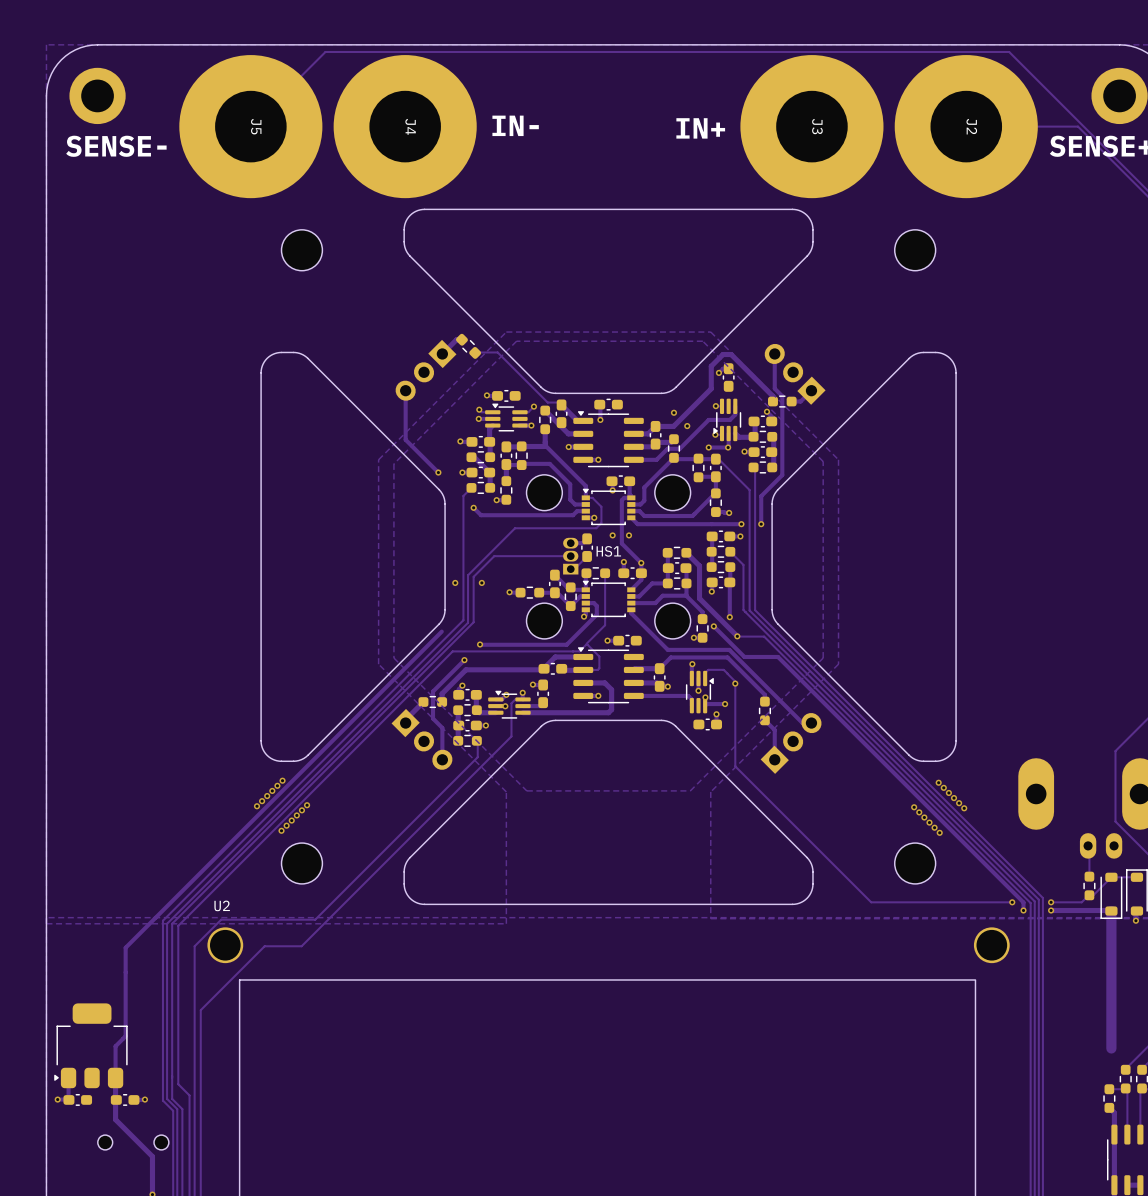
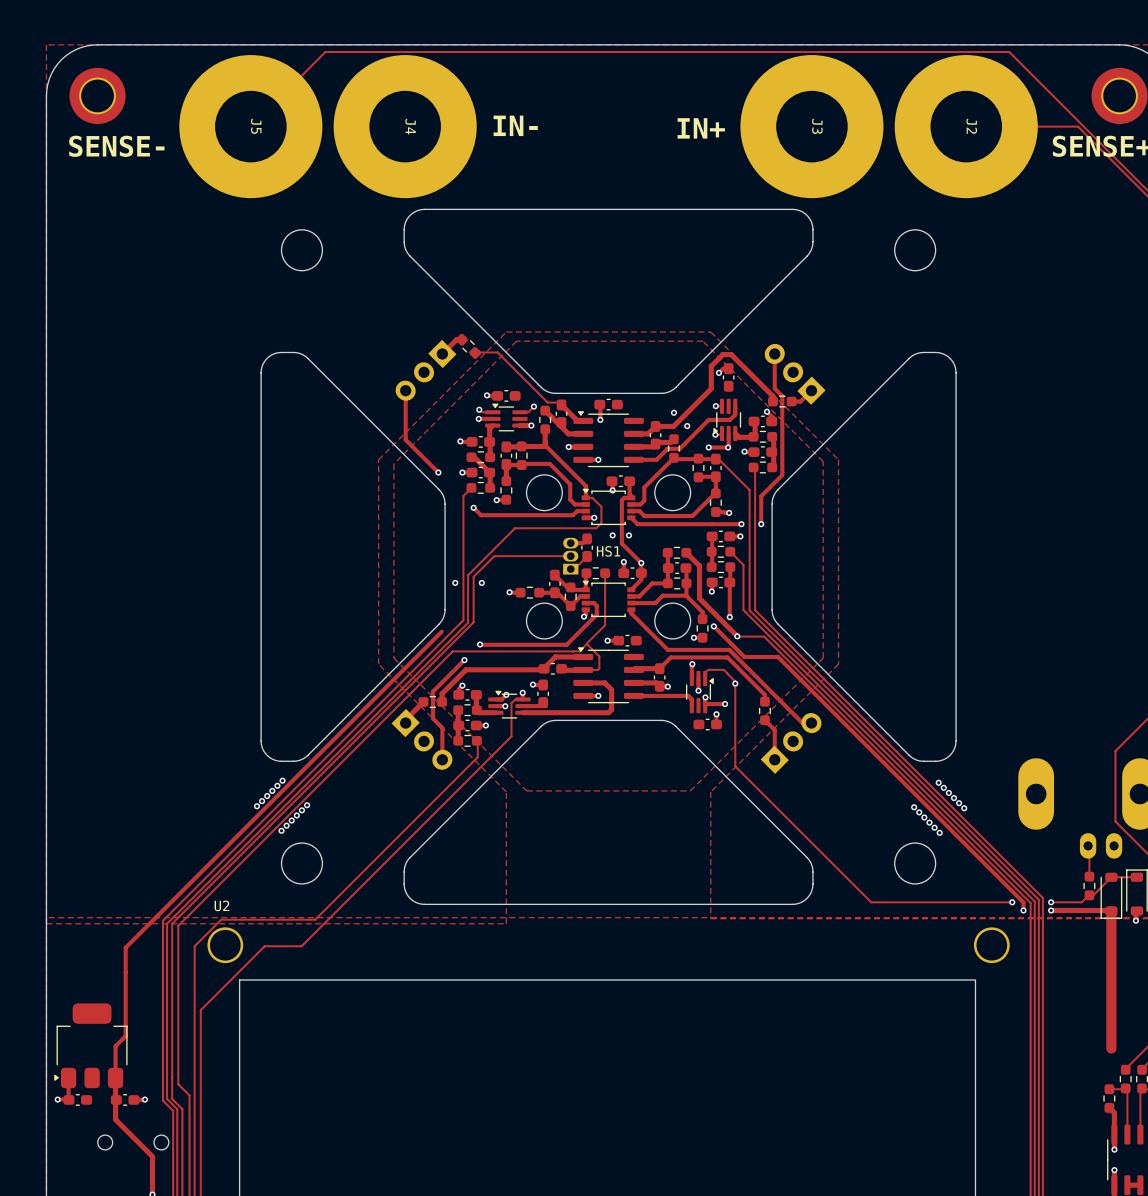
track: (1114, 1149) (1114, 1170) -> none
via: none -> (1114, 1149)
via: none -> (1114, 1170)

